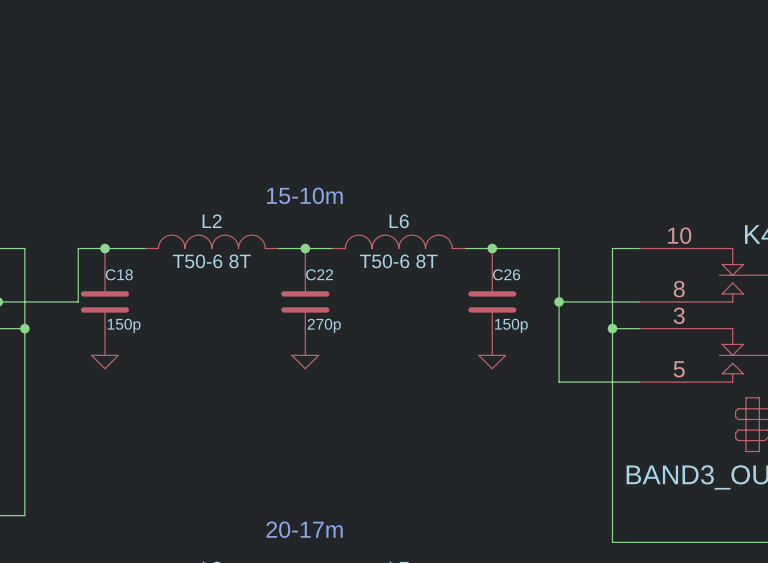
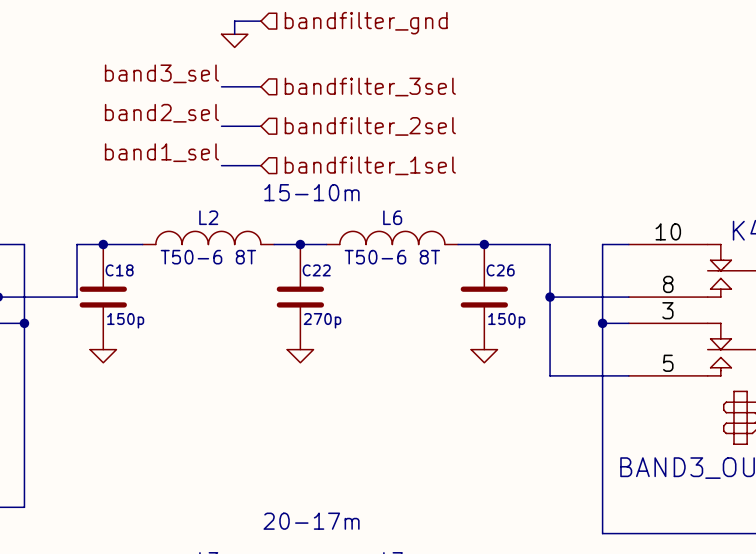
wire: none -> (260, 21) (234, 21) (234, 34)
hierarchical label: none -> bandfilter_gnd (366, 23)
power symbol: none -> (234, 40)
label: none -> band3_sel (161, 73)
wire: none -> (221, 86) (260, 86)
hierarchical label: none -> bandfilter_3sel (370, 87)
label: none -> band2_sel (161, 113)
wire: none -> (221, 126) (260, 126)
hierarchical label: none -> bandfilter_2sel (370, 126)
label: none -> band1_sel (161, 152)
wire: none -> (221, 165) (260, 165)
hierarchical label: none -> bandfilter_1sel (370, 165)

